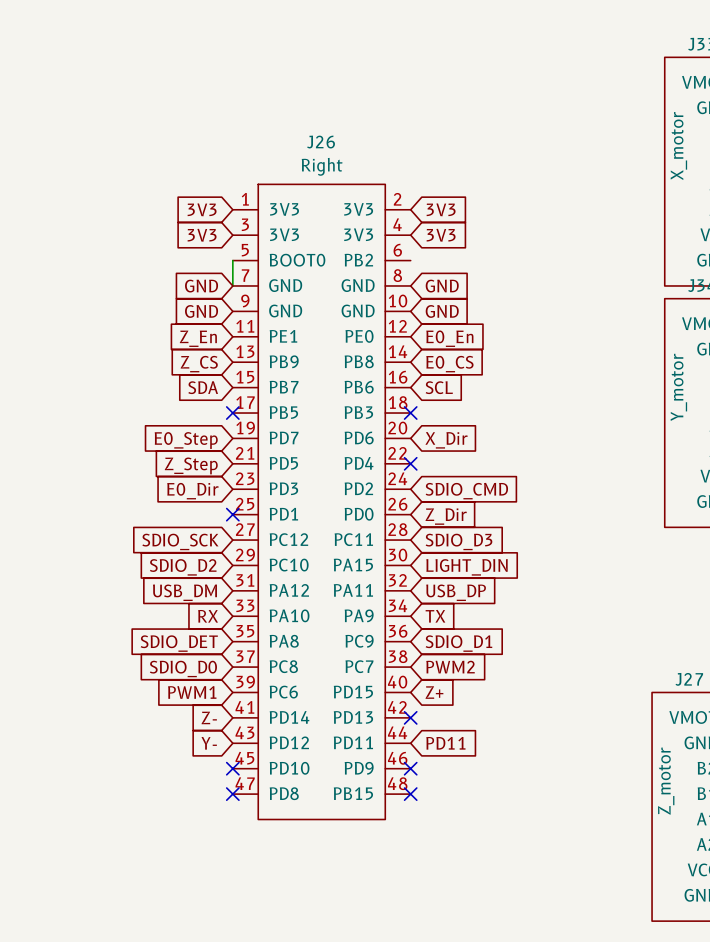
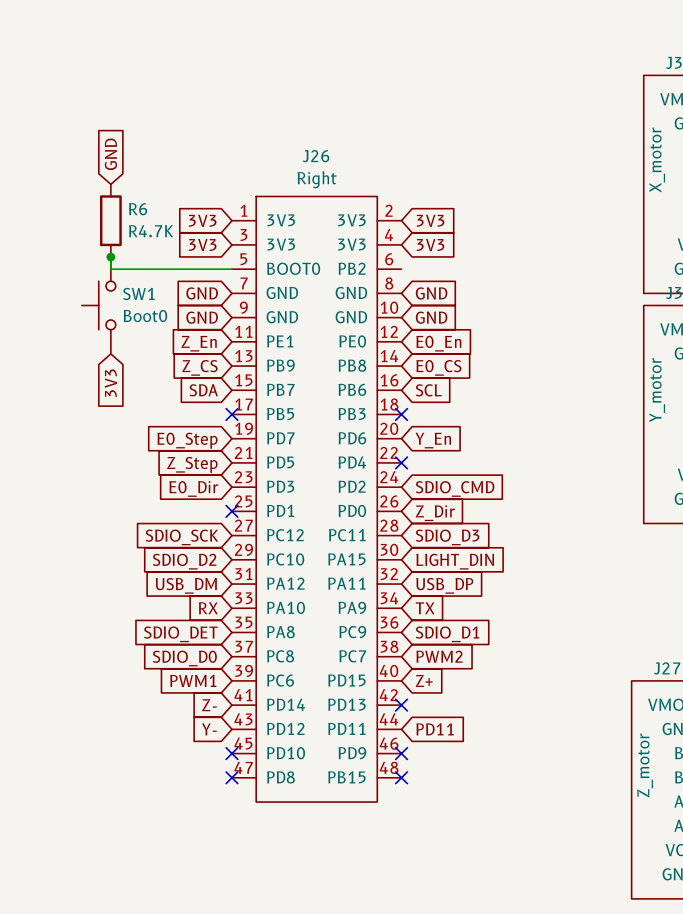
global label: none -> GND (110, 154)
R6: none -> R4.7K (110, 220)
junction: none -> (110, 257)
wire: (232, 260) (232, 285) -> (231, 269) (110, 269) (110, 257)
SW1: none -> Boot0 (98, 305)
global label: none -> 3V3 (110, 383)
global label: X_Dir (446, 440) -> Y_En (433, 440)

